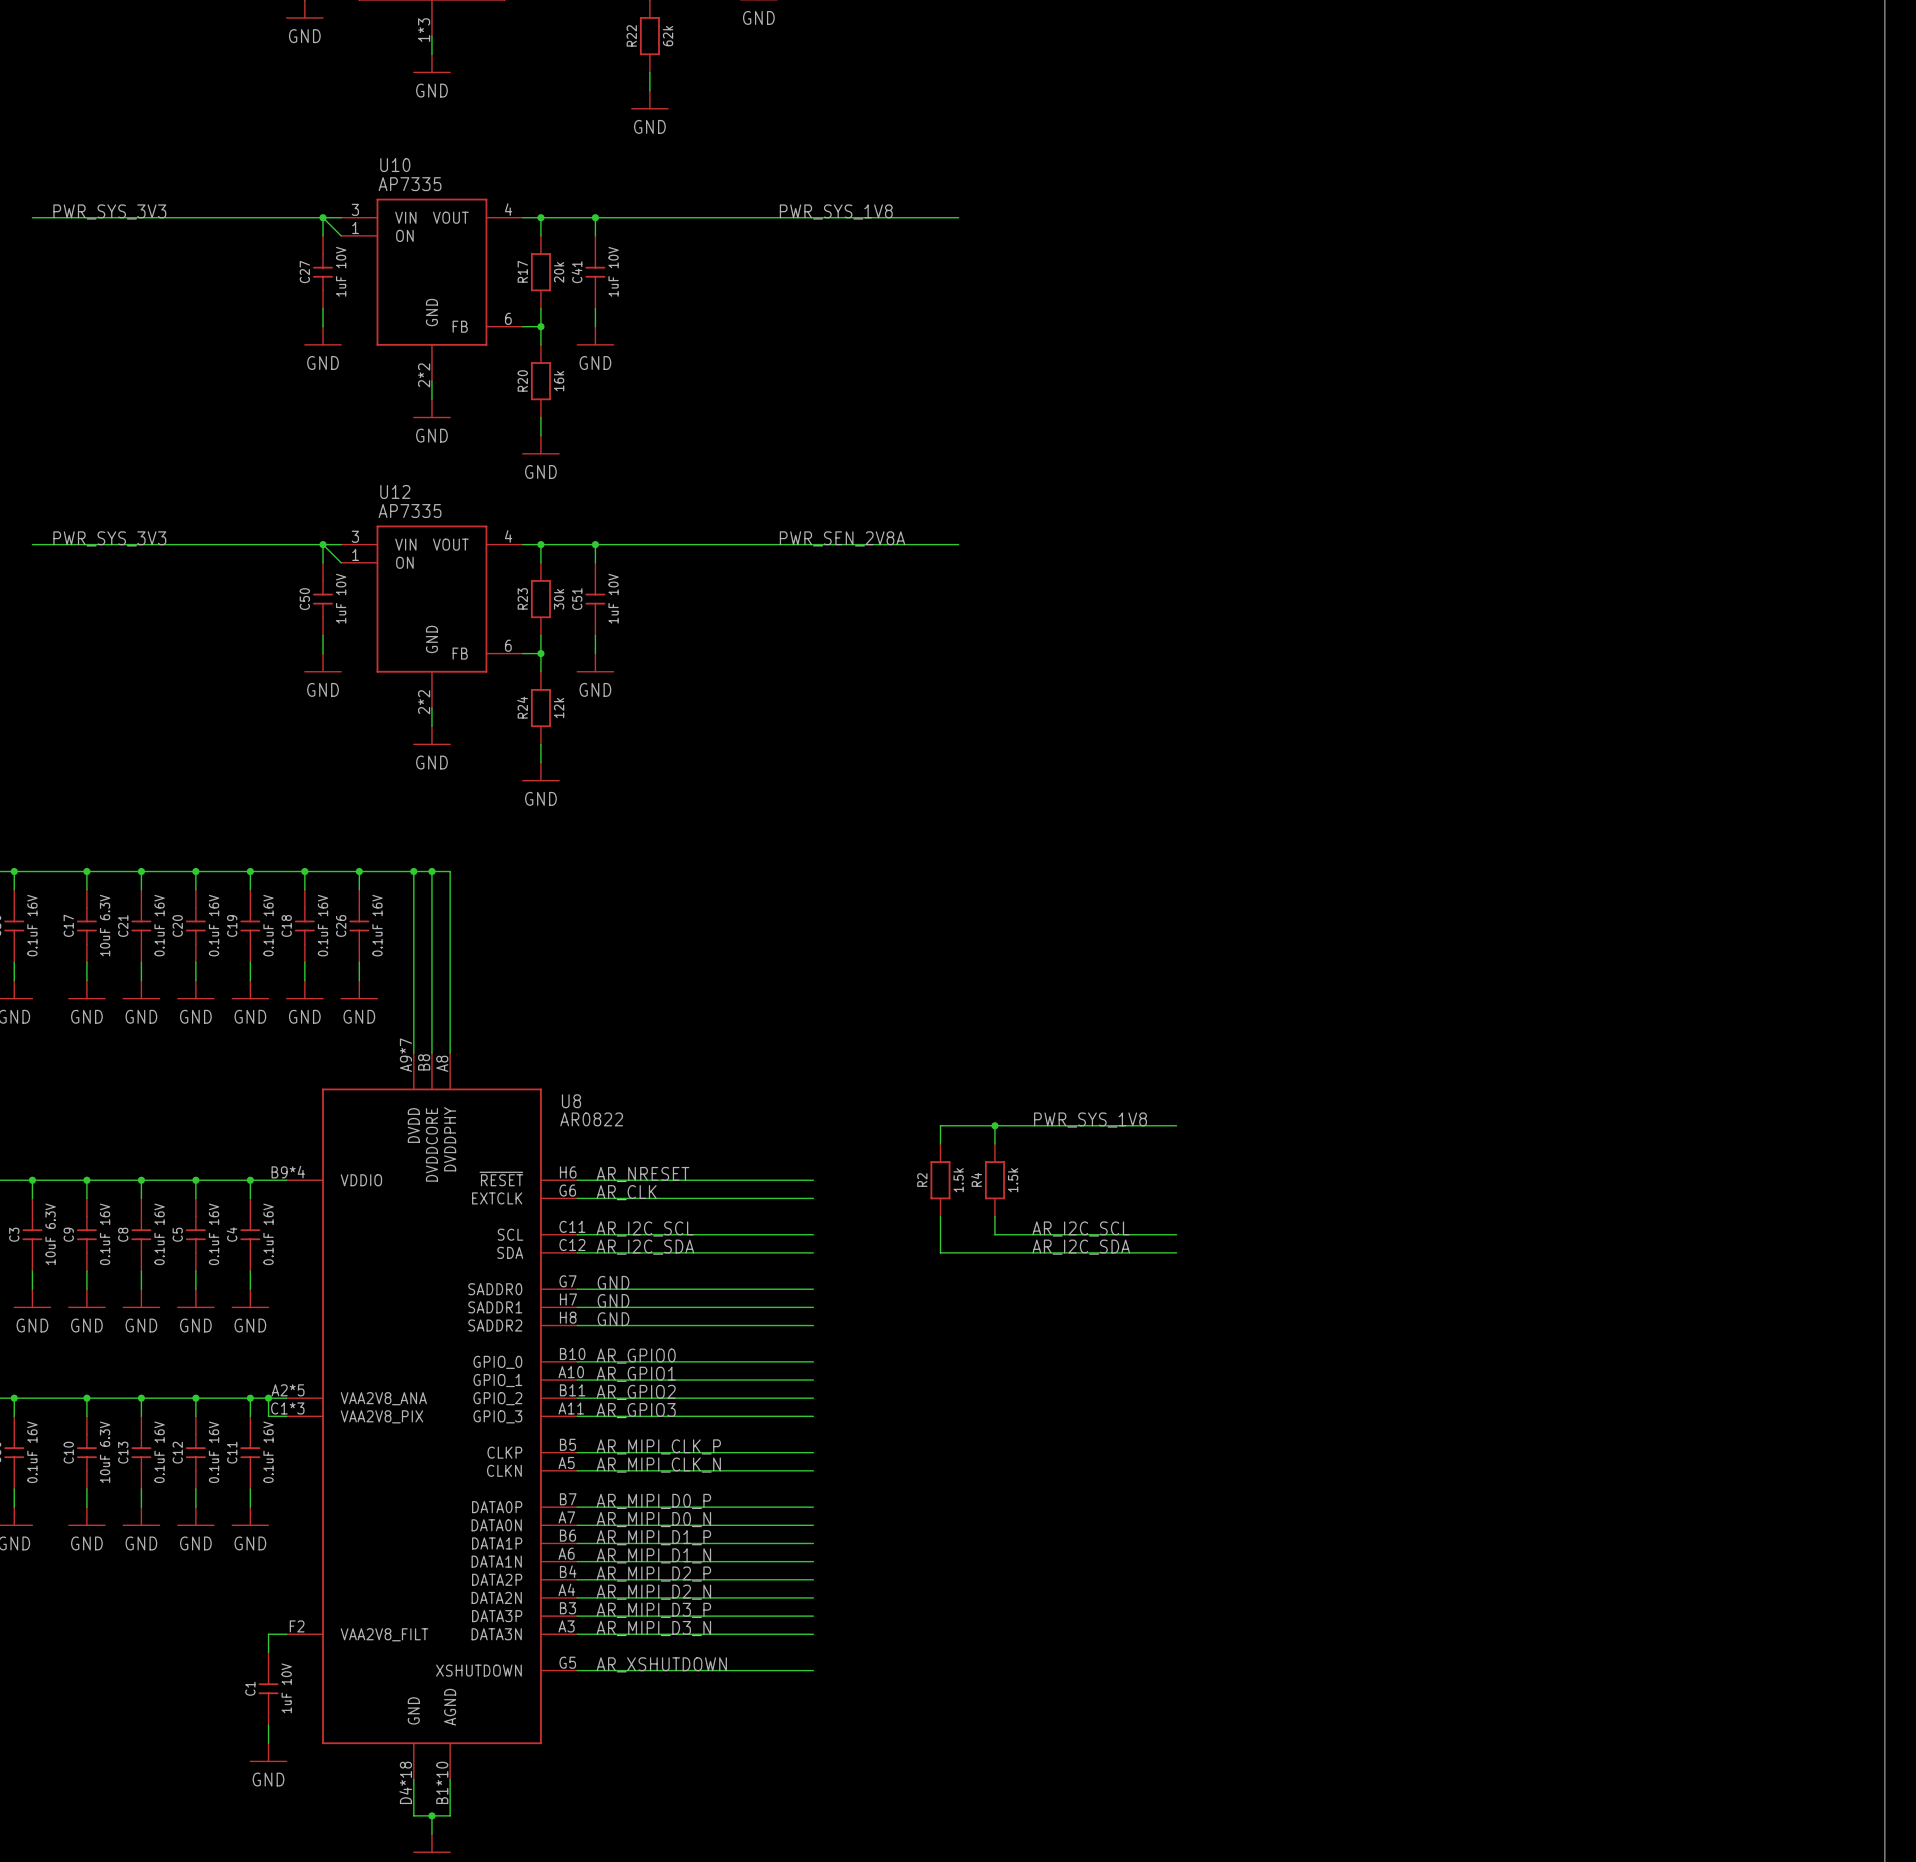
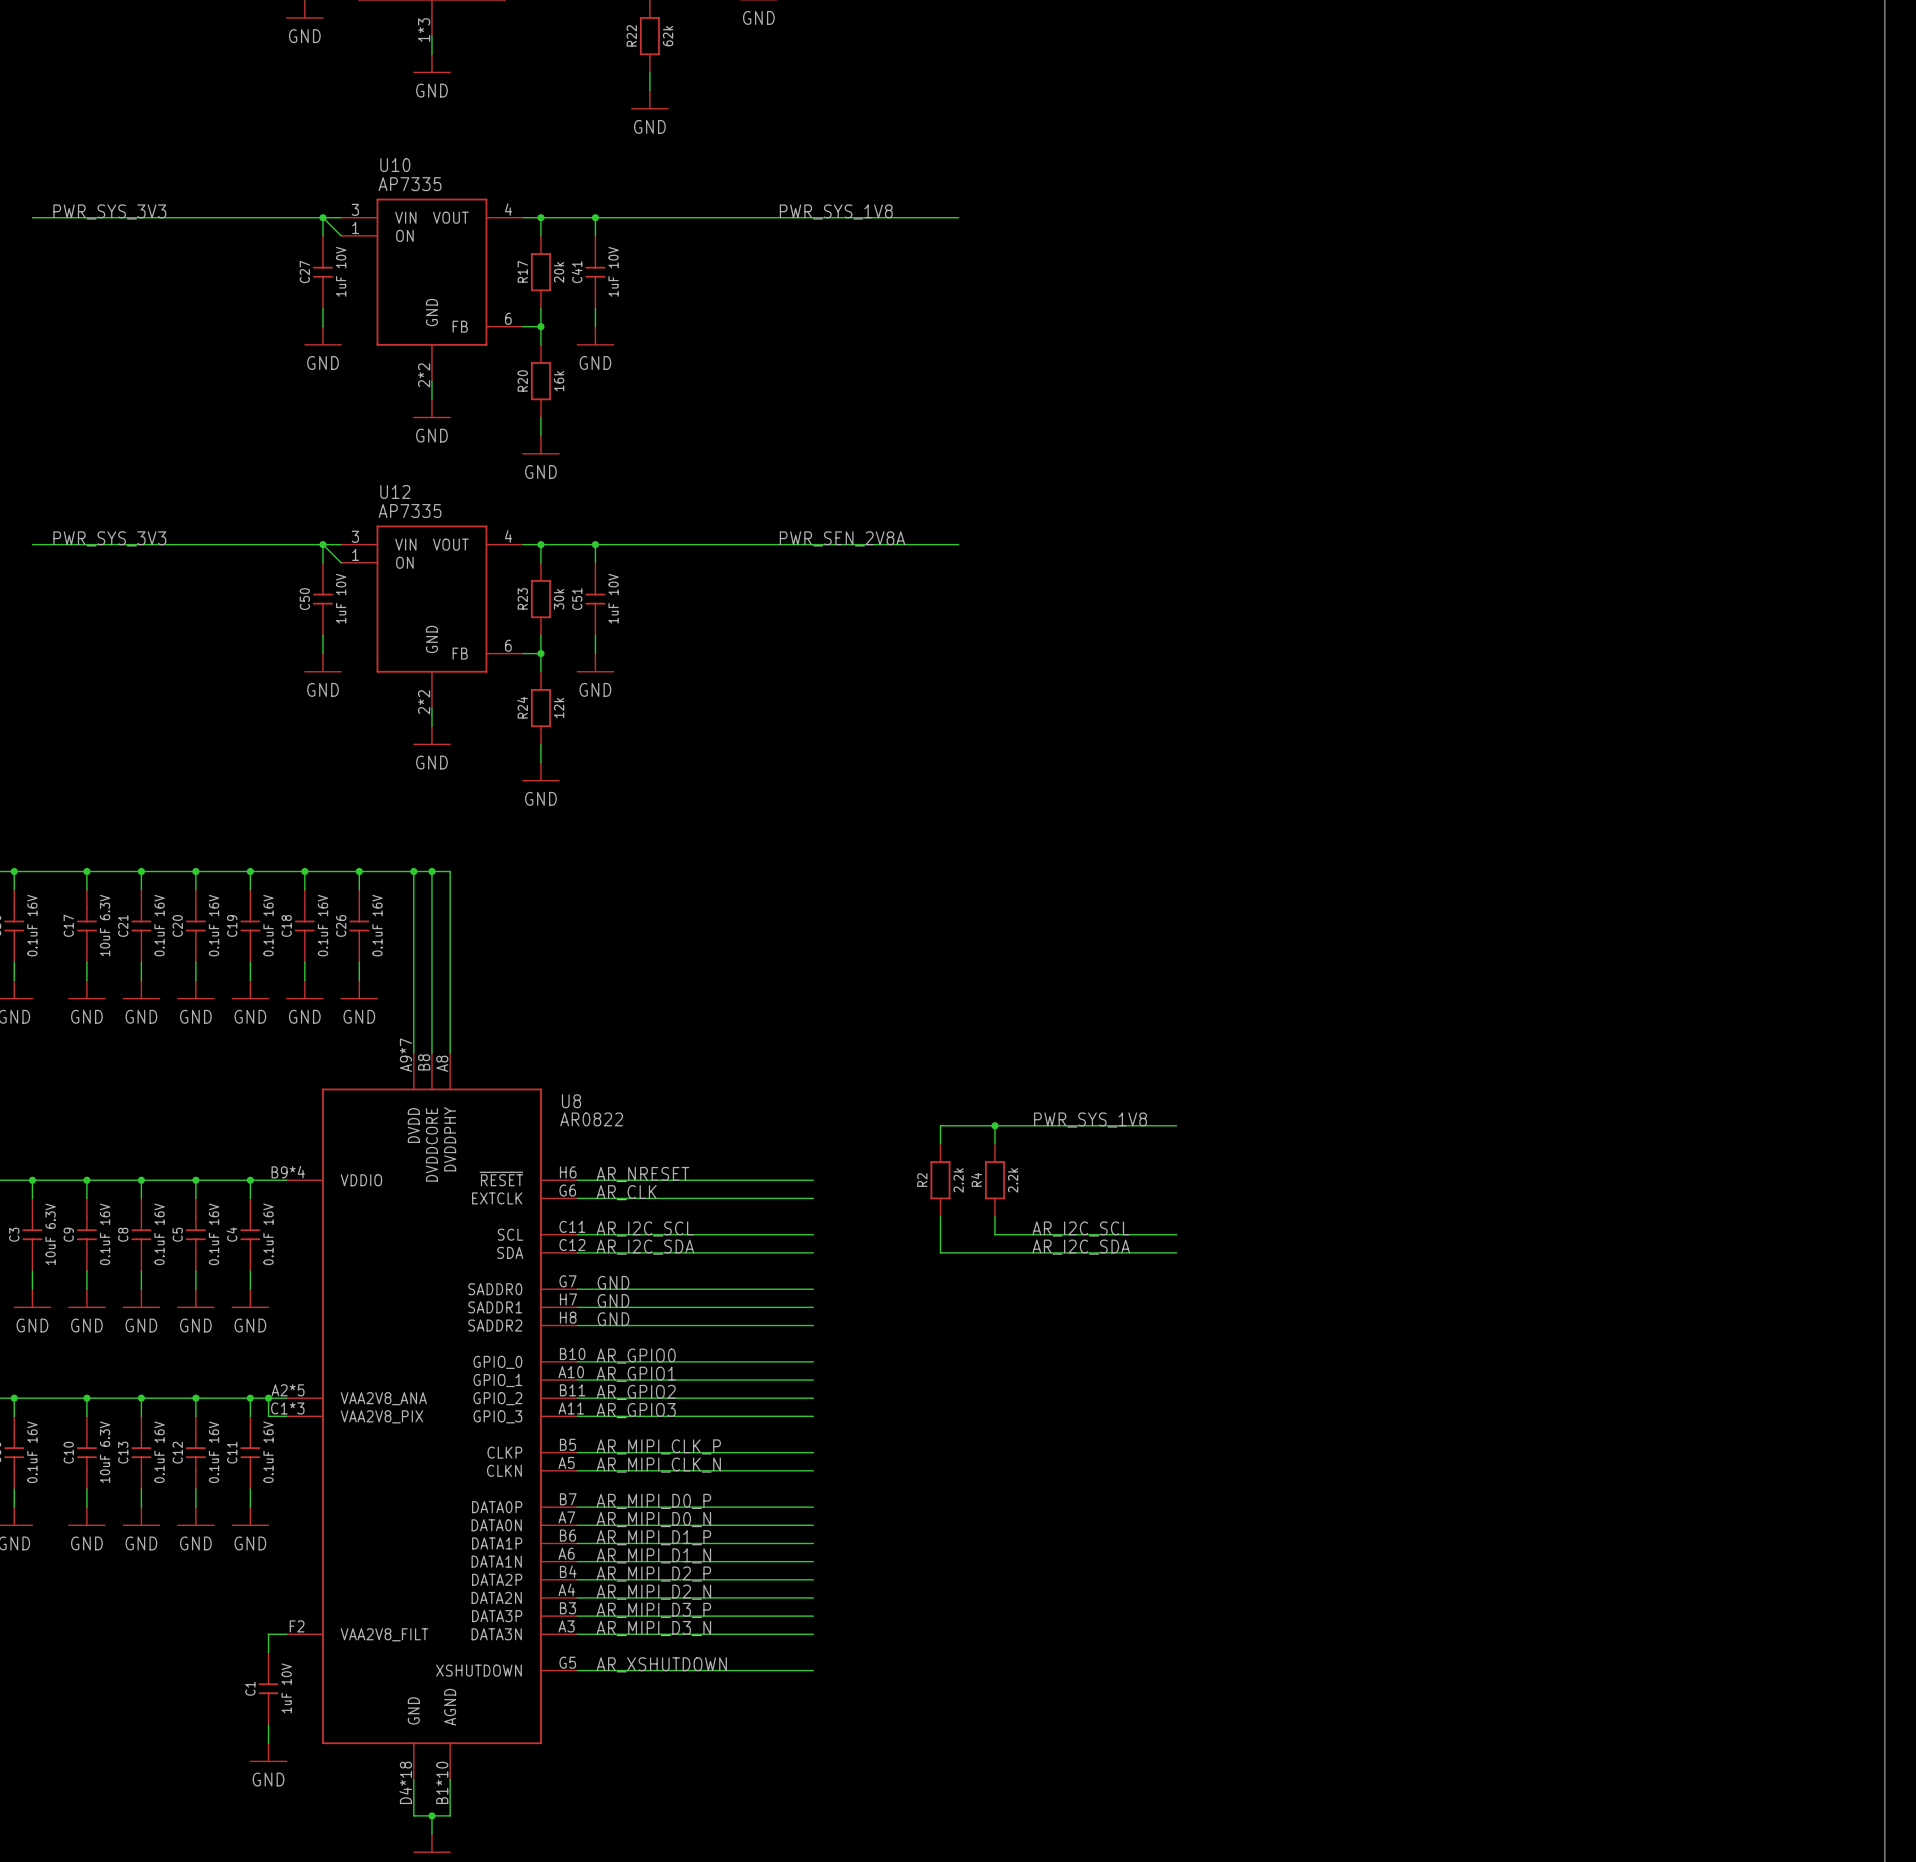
R2 value: 1.5k (958, 1180) -> 2.2k (958, 1180)
R4 value: 1.5k (1013, 1180) -> 2.2k (1013, 1180)

